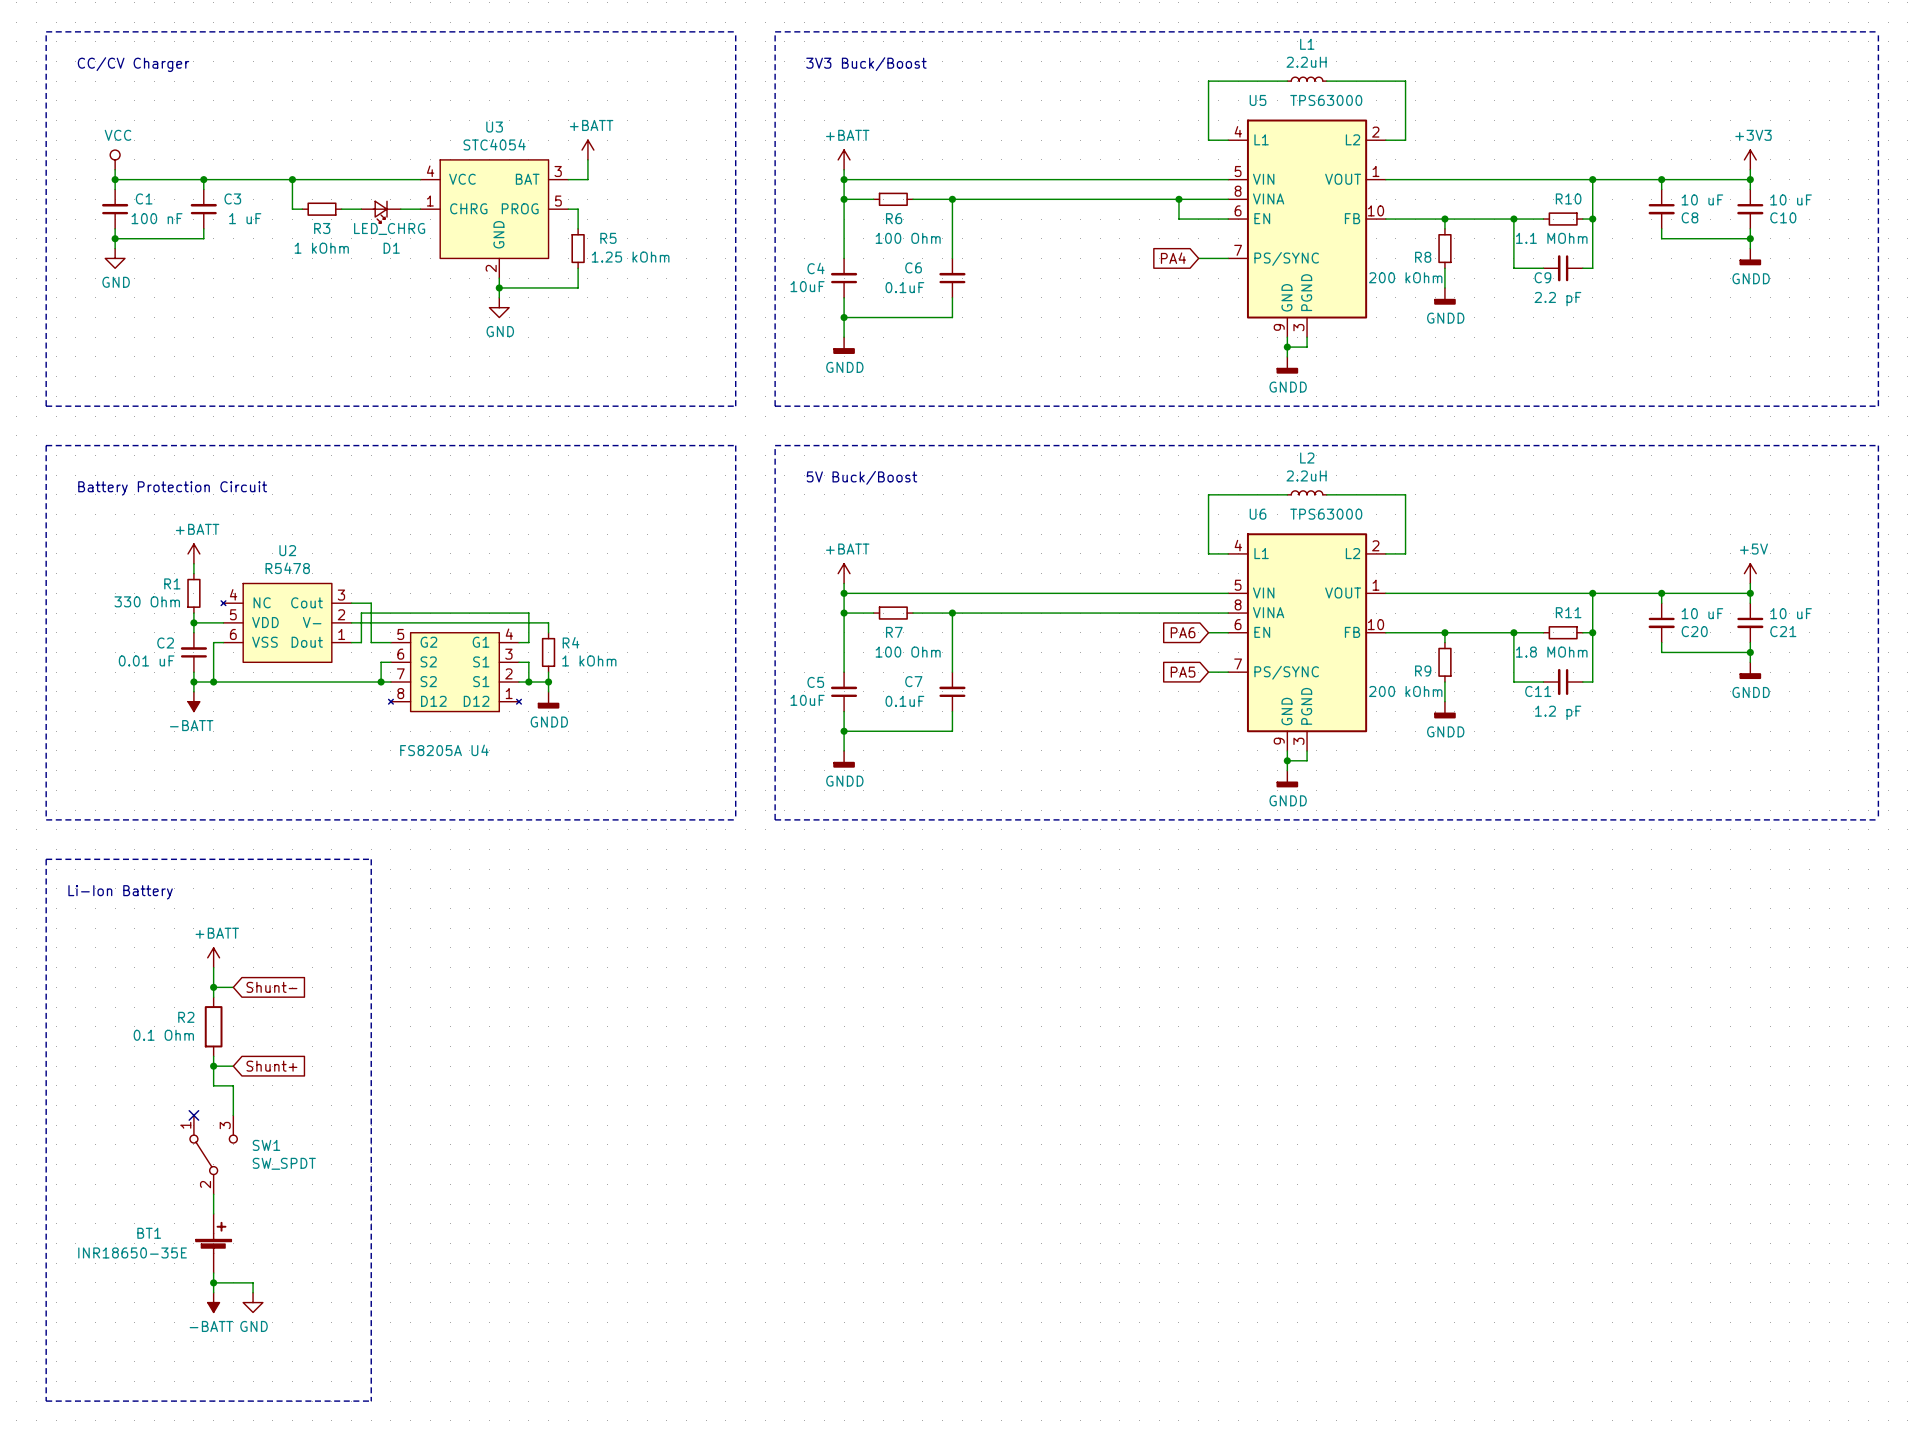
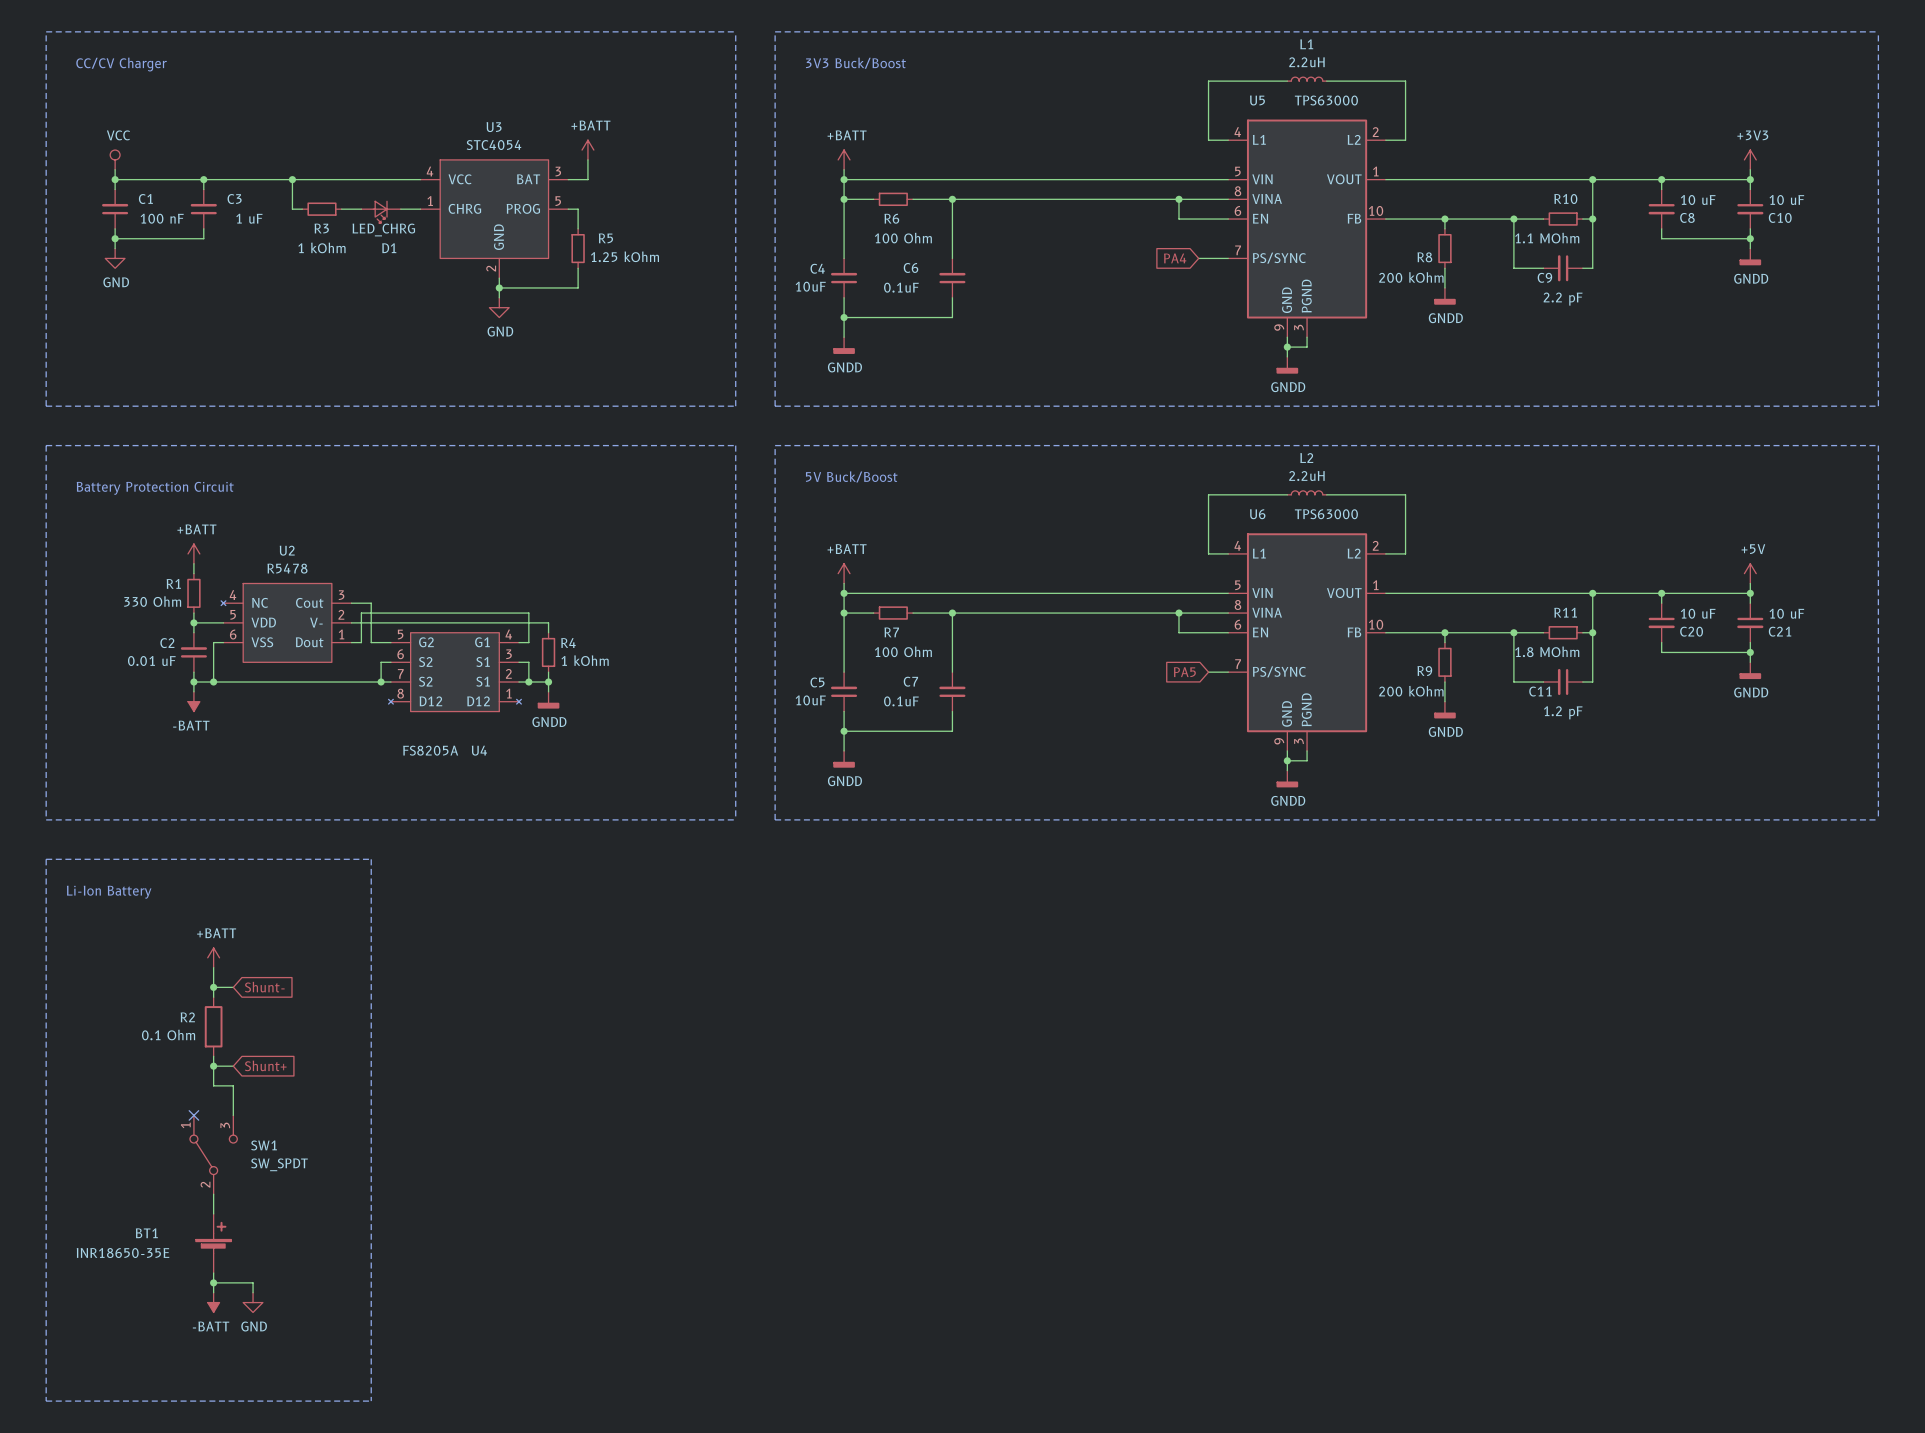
wire: none -> (1178, 613) (1178, 632) (1208, 632)
junction: none -> (1178, 613)
global label: PA6 (1183, 632) -> none

